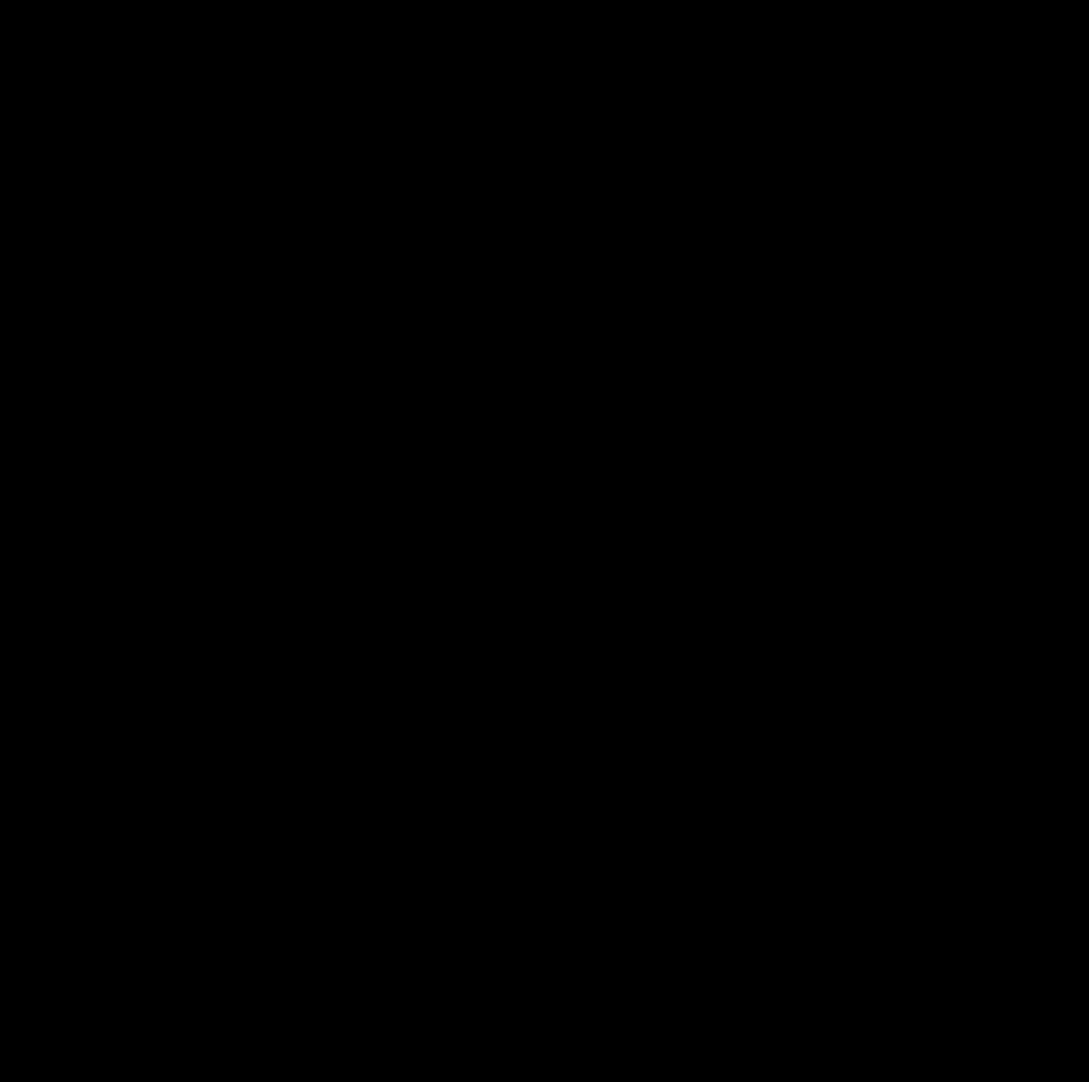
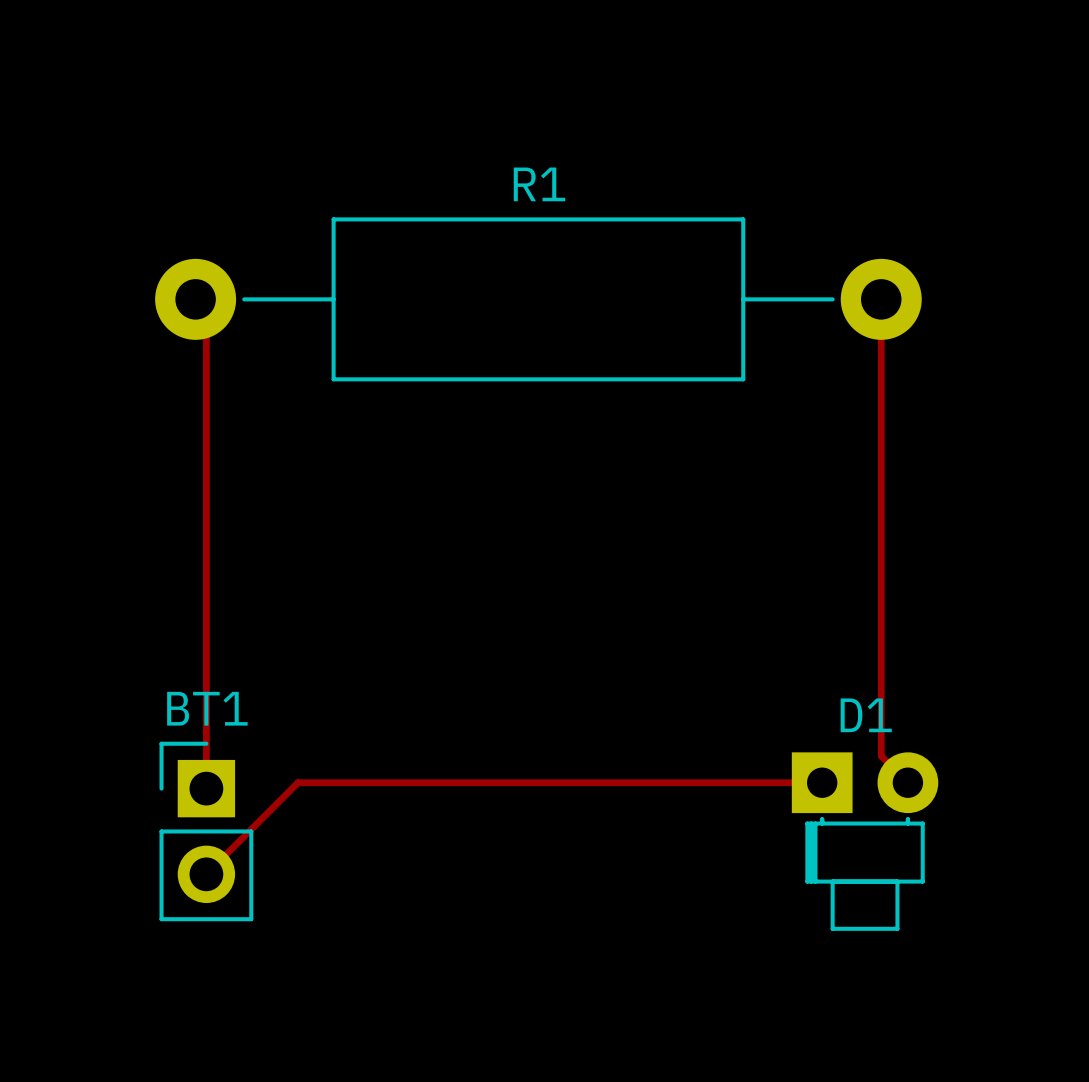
top track: none -> (195, 299) (206, 310) (206, 788)
R1: none -> (538, 299)
top track: none -> (881, 299) (881, 756) (907, 782)
top track: none -> (822, 782) (298, 782) (206, 874)
BT1: none -> (206, 831)
D1: none -> (865, 841)

